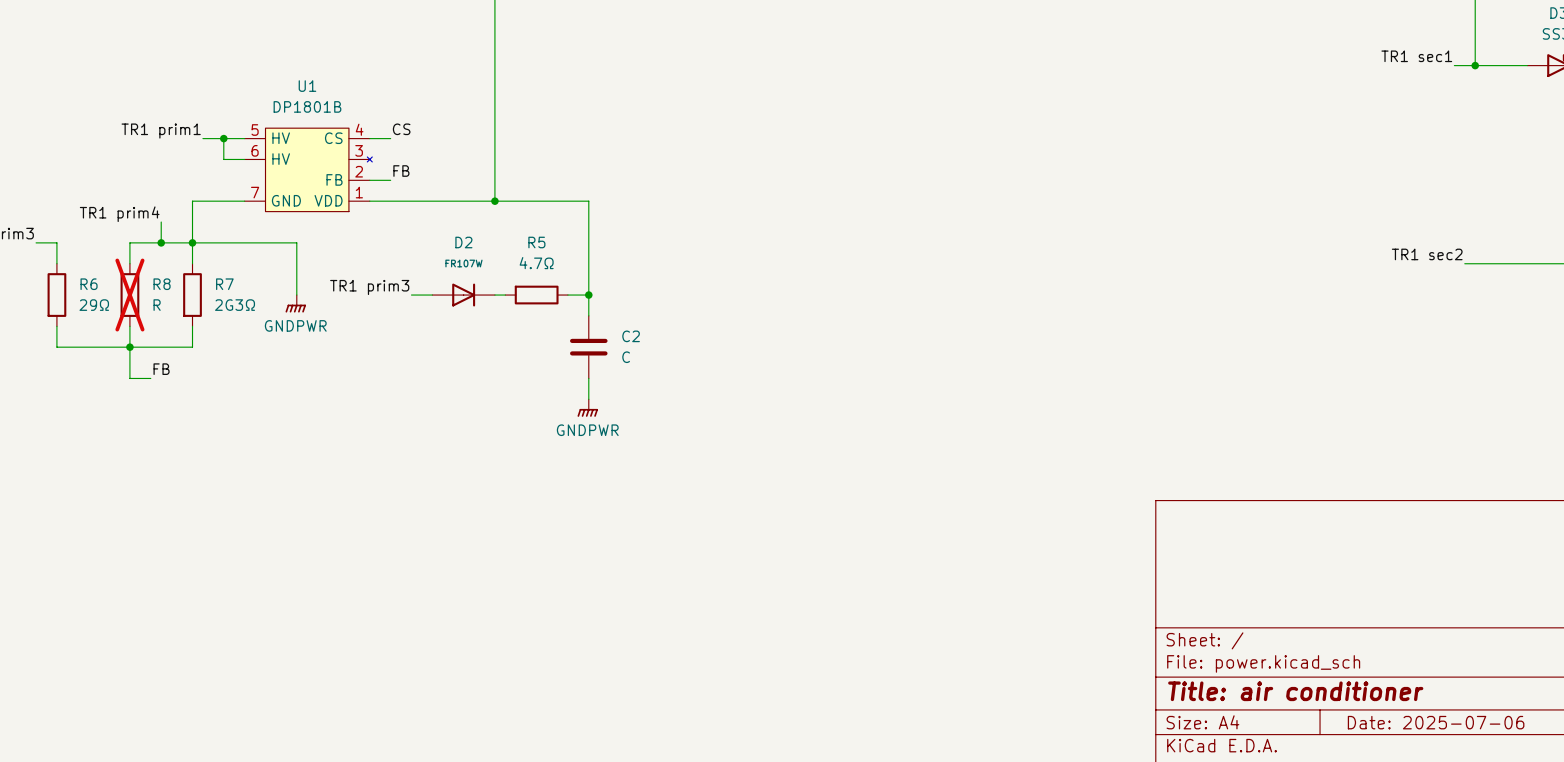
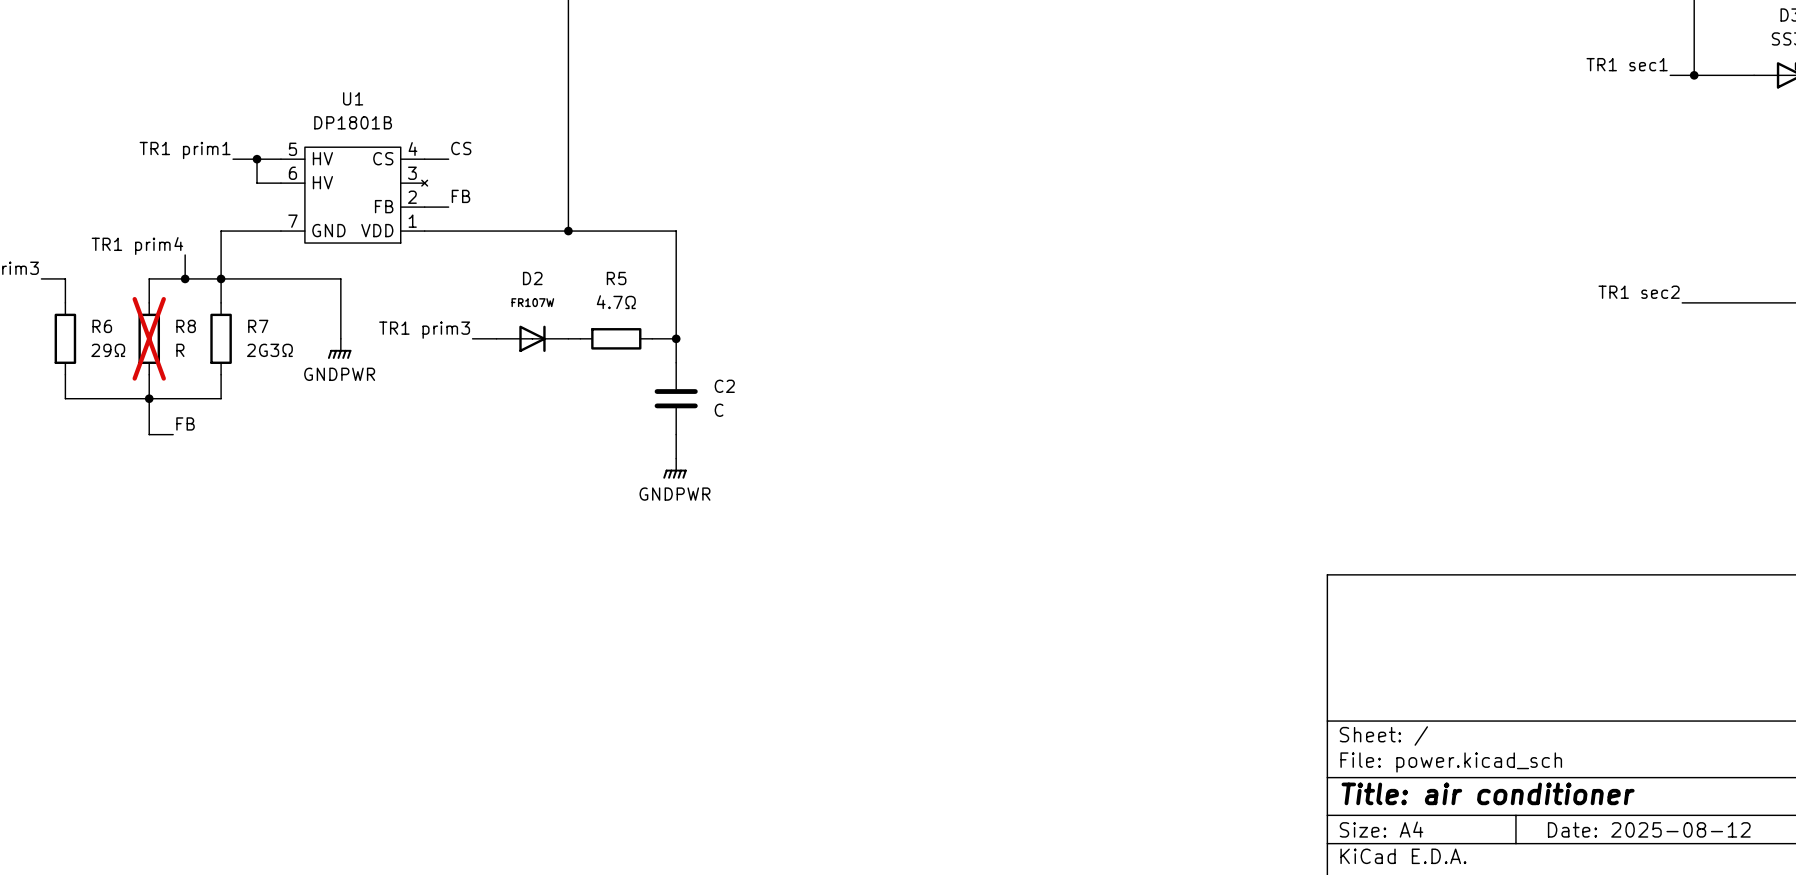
title block: Date: 2025-07-06 (1436, 722) -> Date: 2025-08-12 (1649, 829)

